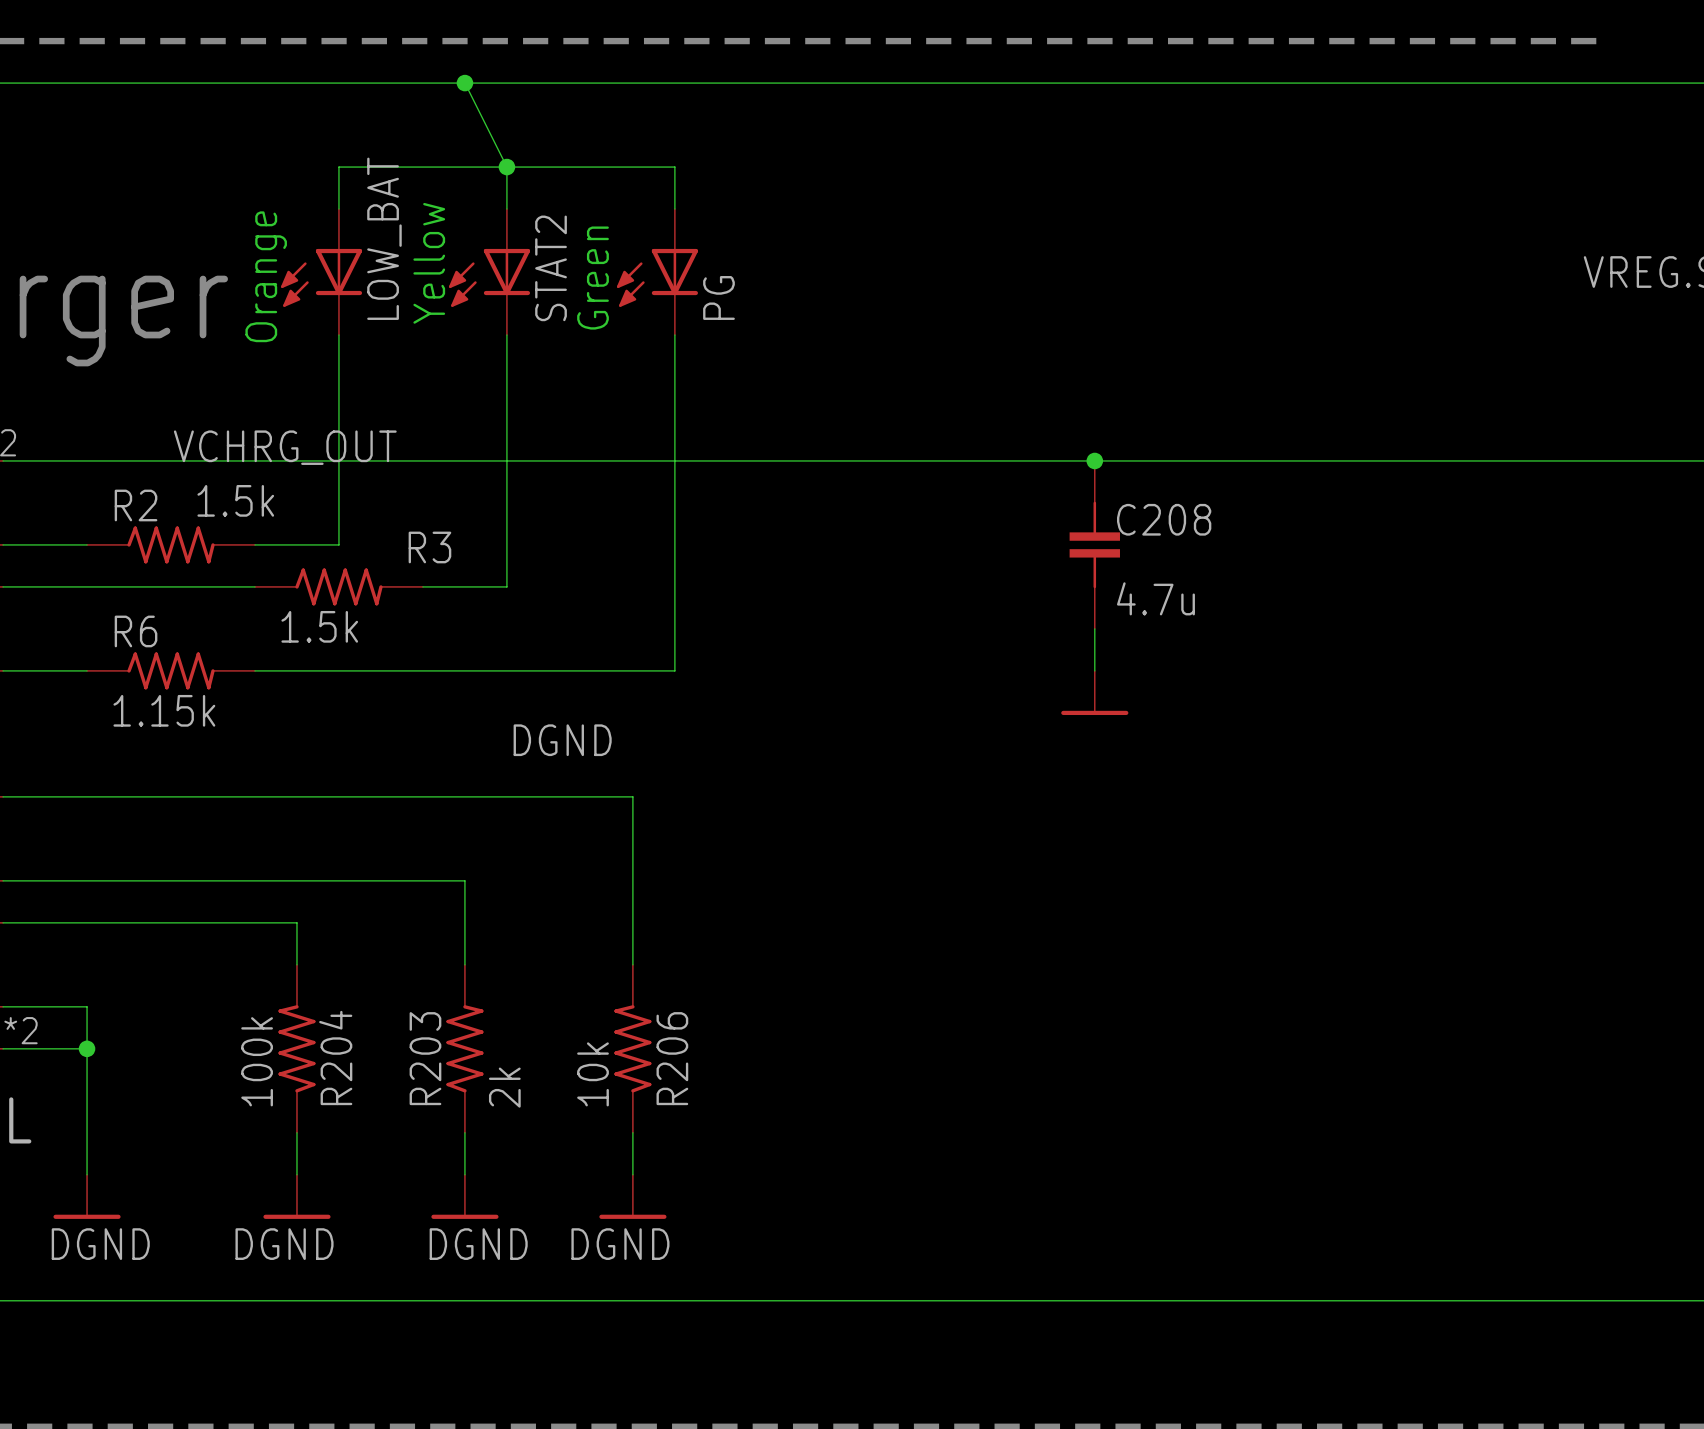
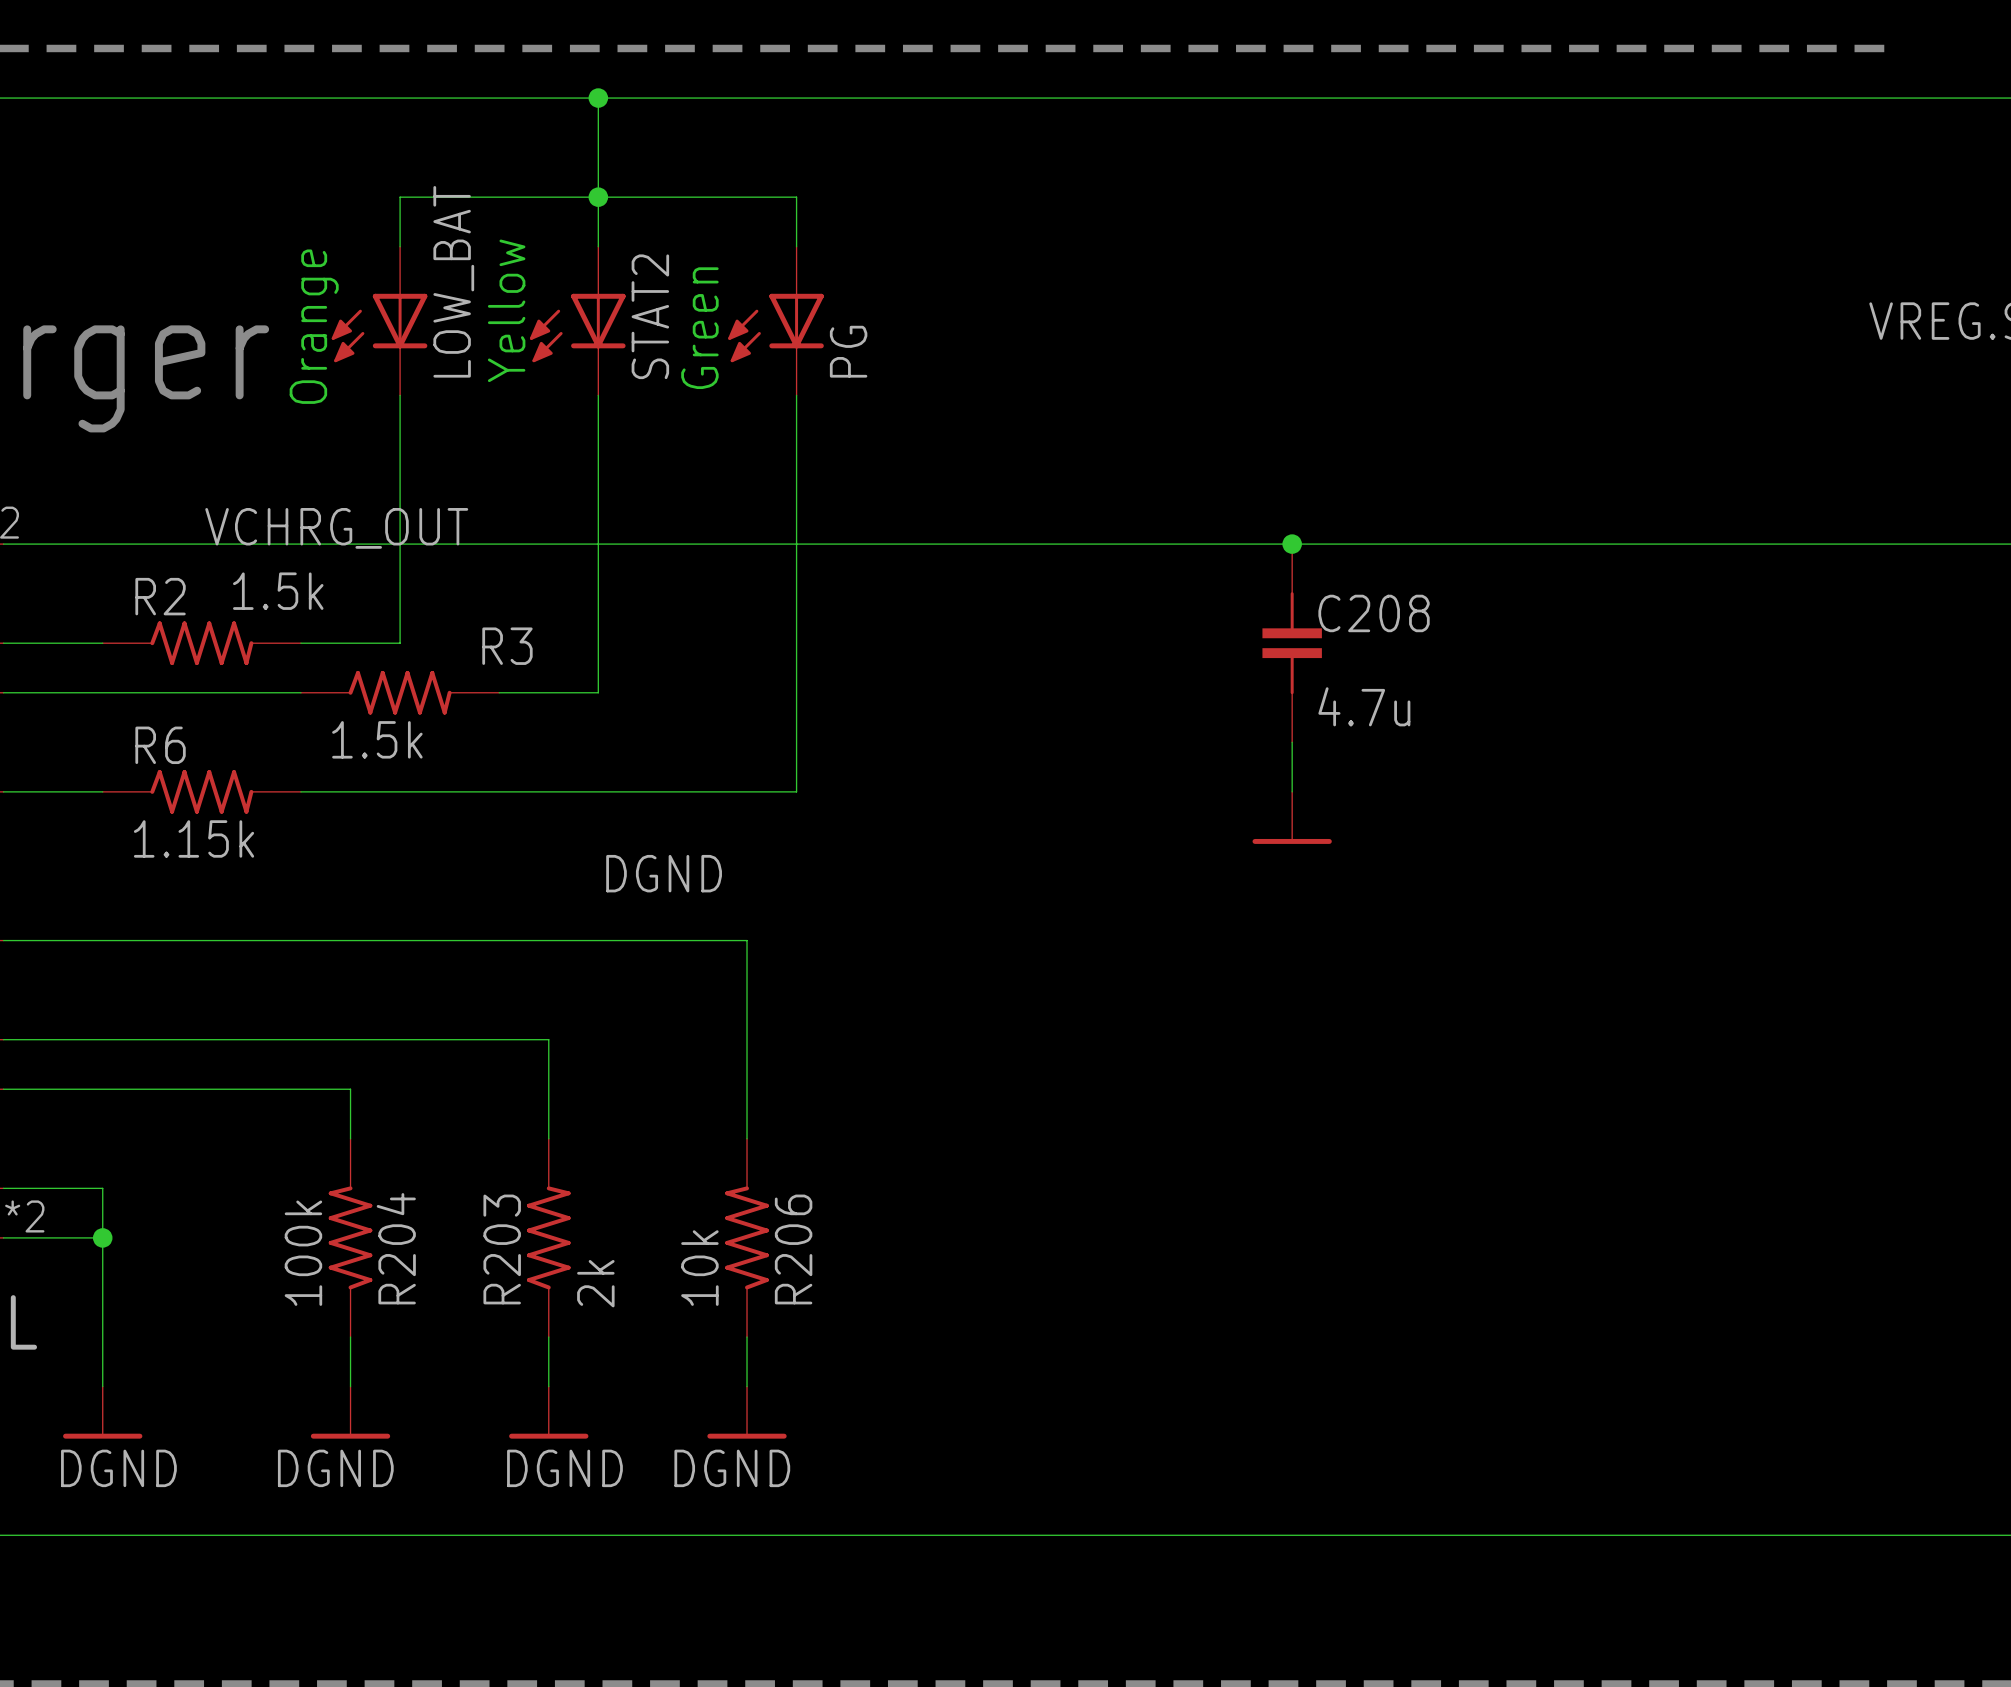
wire: (464, 83) (506, 167) -> (598, 98) (598, 197)
junction position: (464, 83) -> (598, 98)

